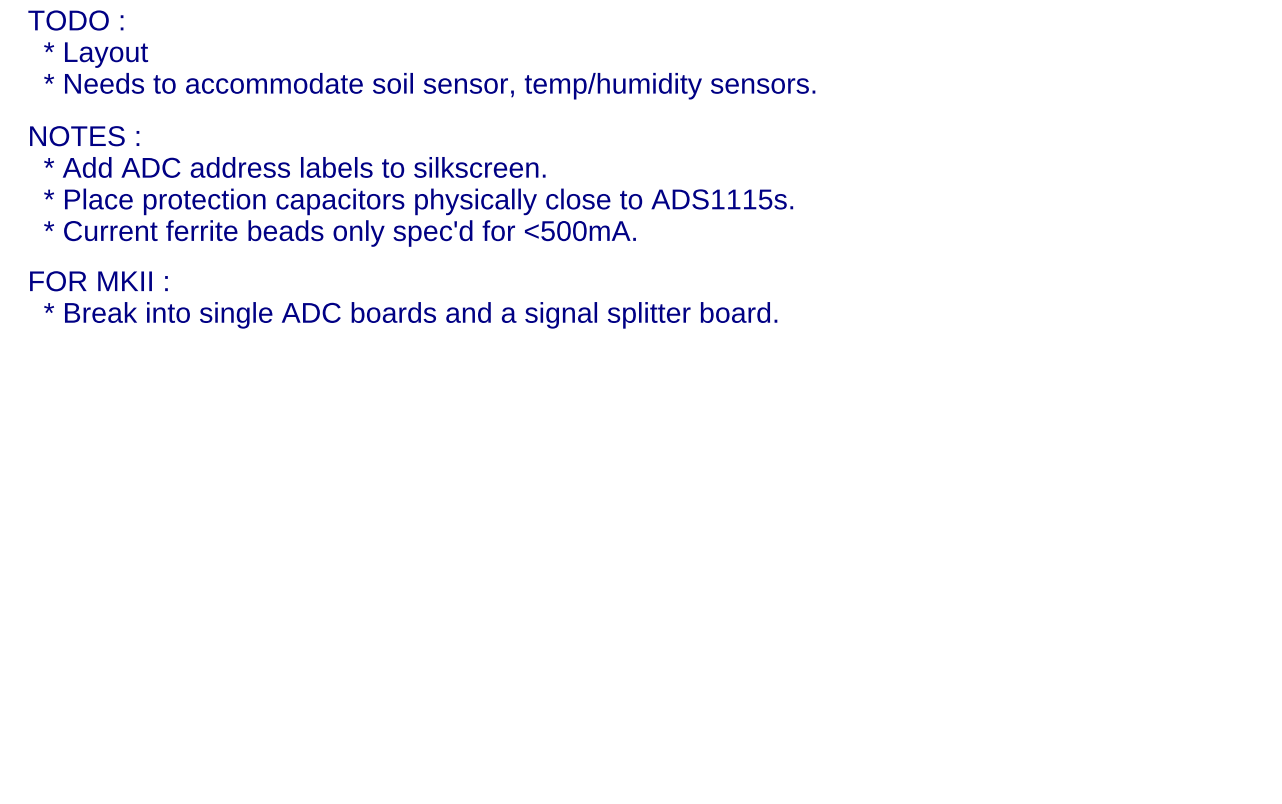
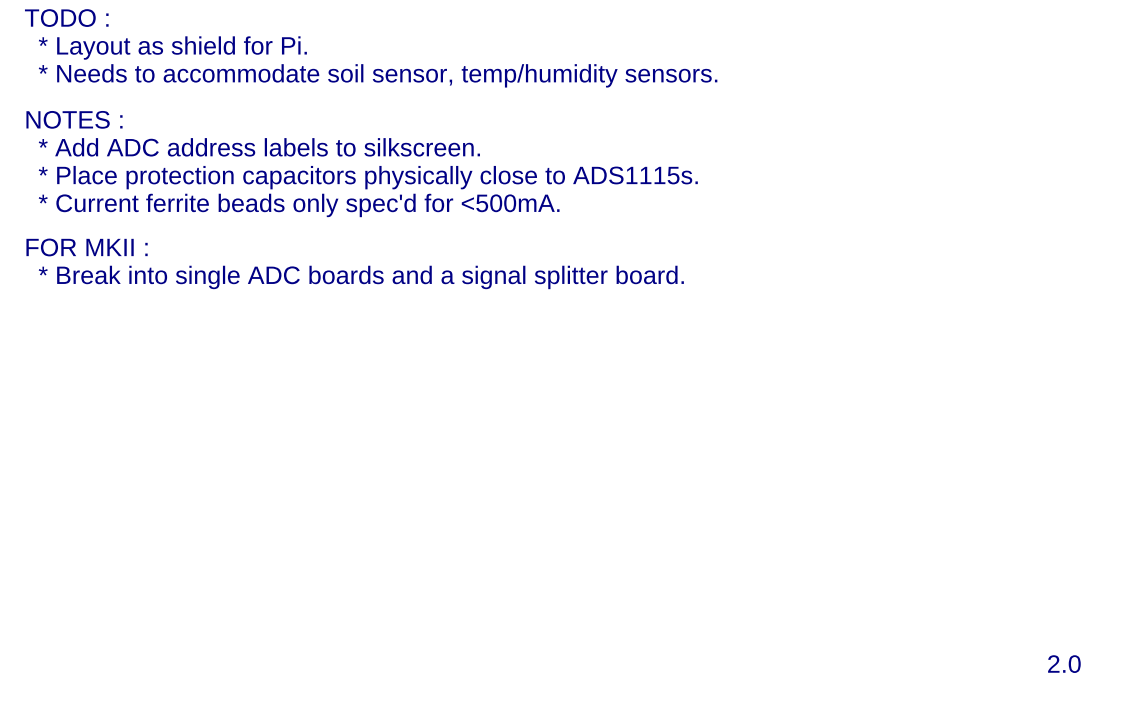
text: * Layout (96, 55) -> * Layout as shield for Pi. (172, 48)
text: none -> 2.0 (1064, 664)

